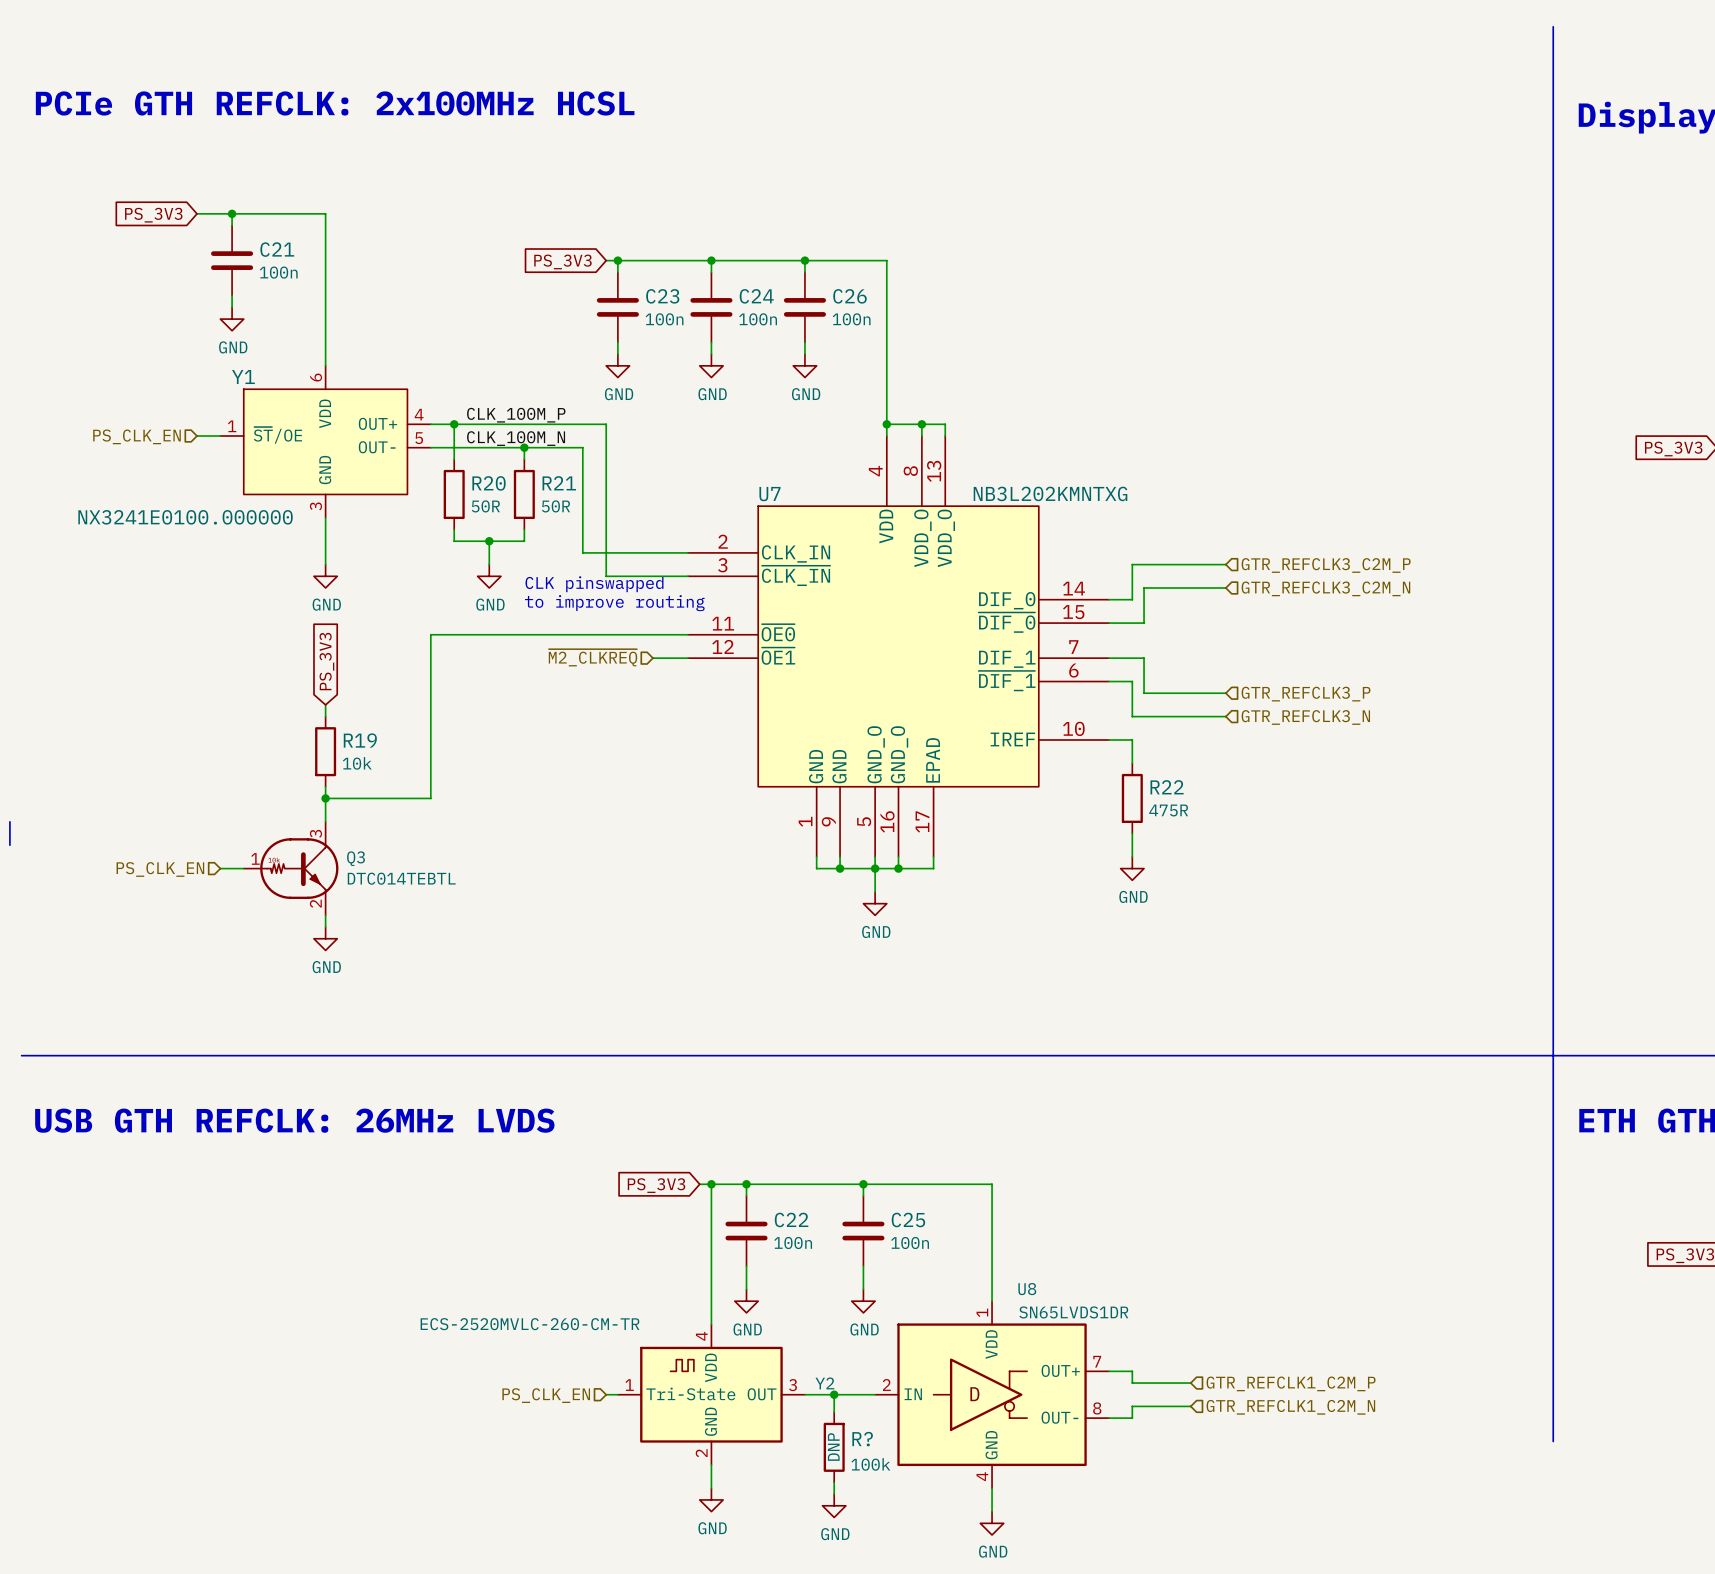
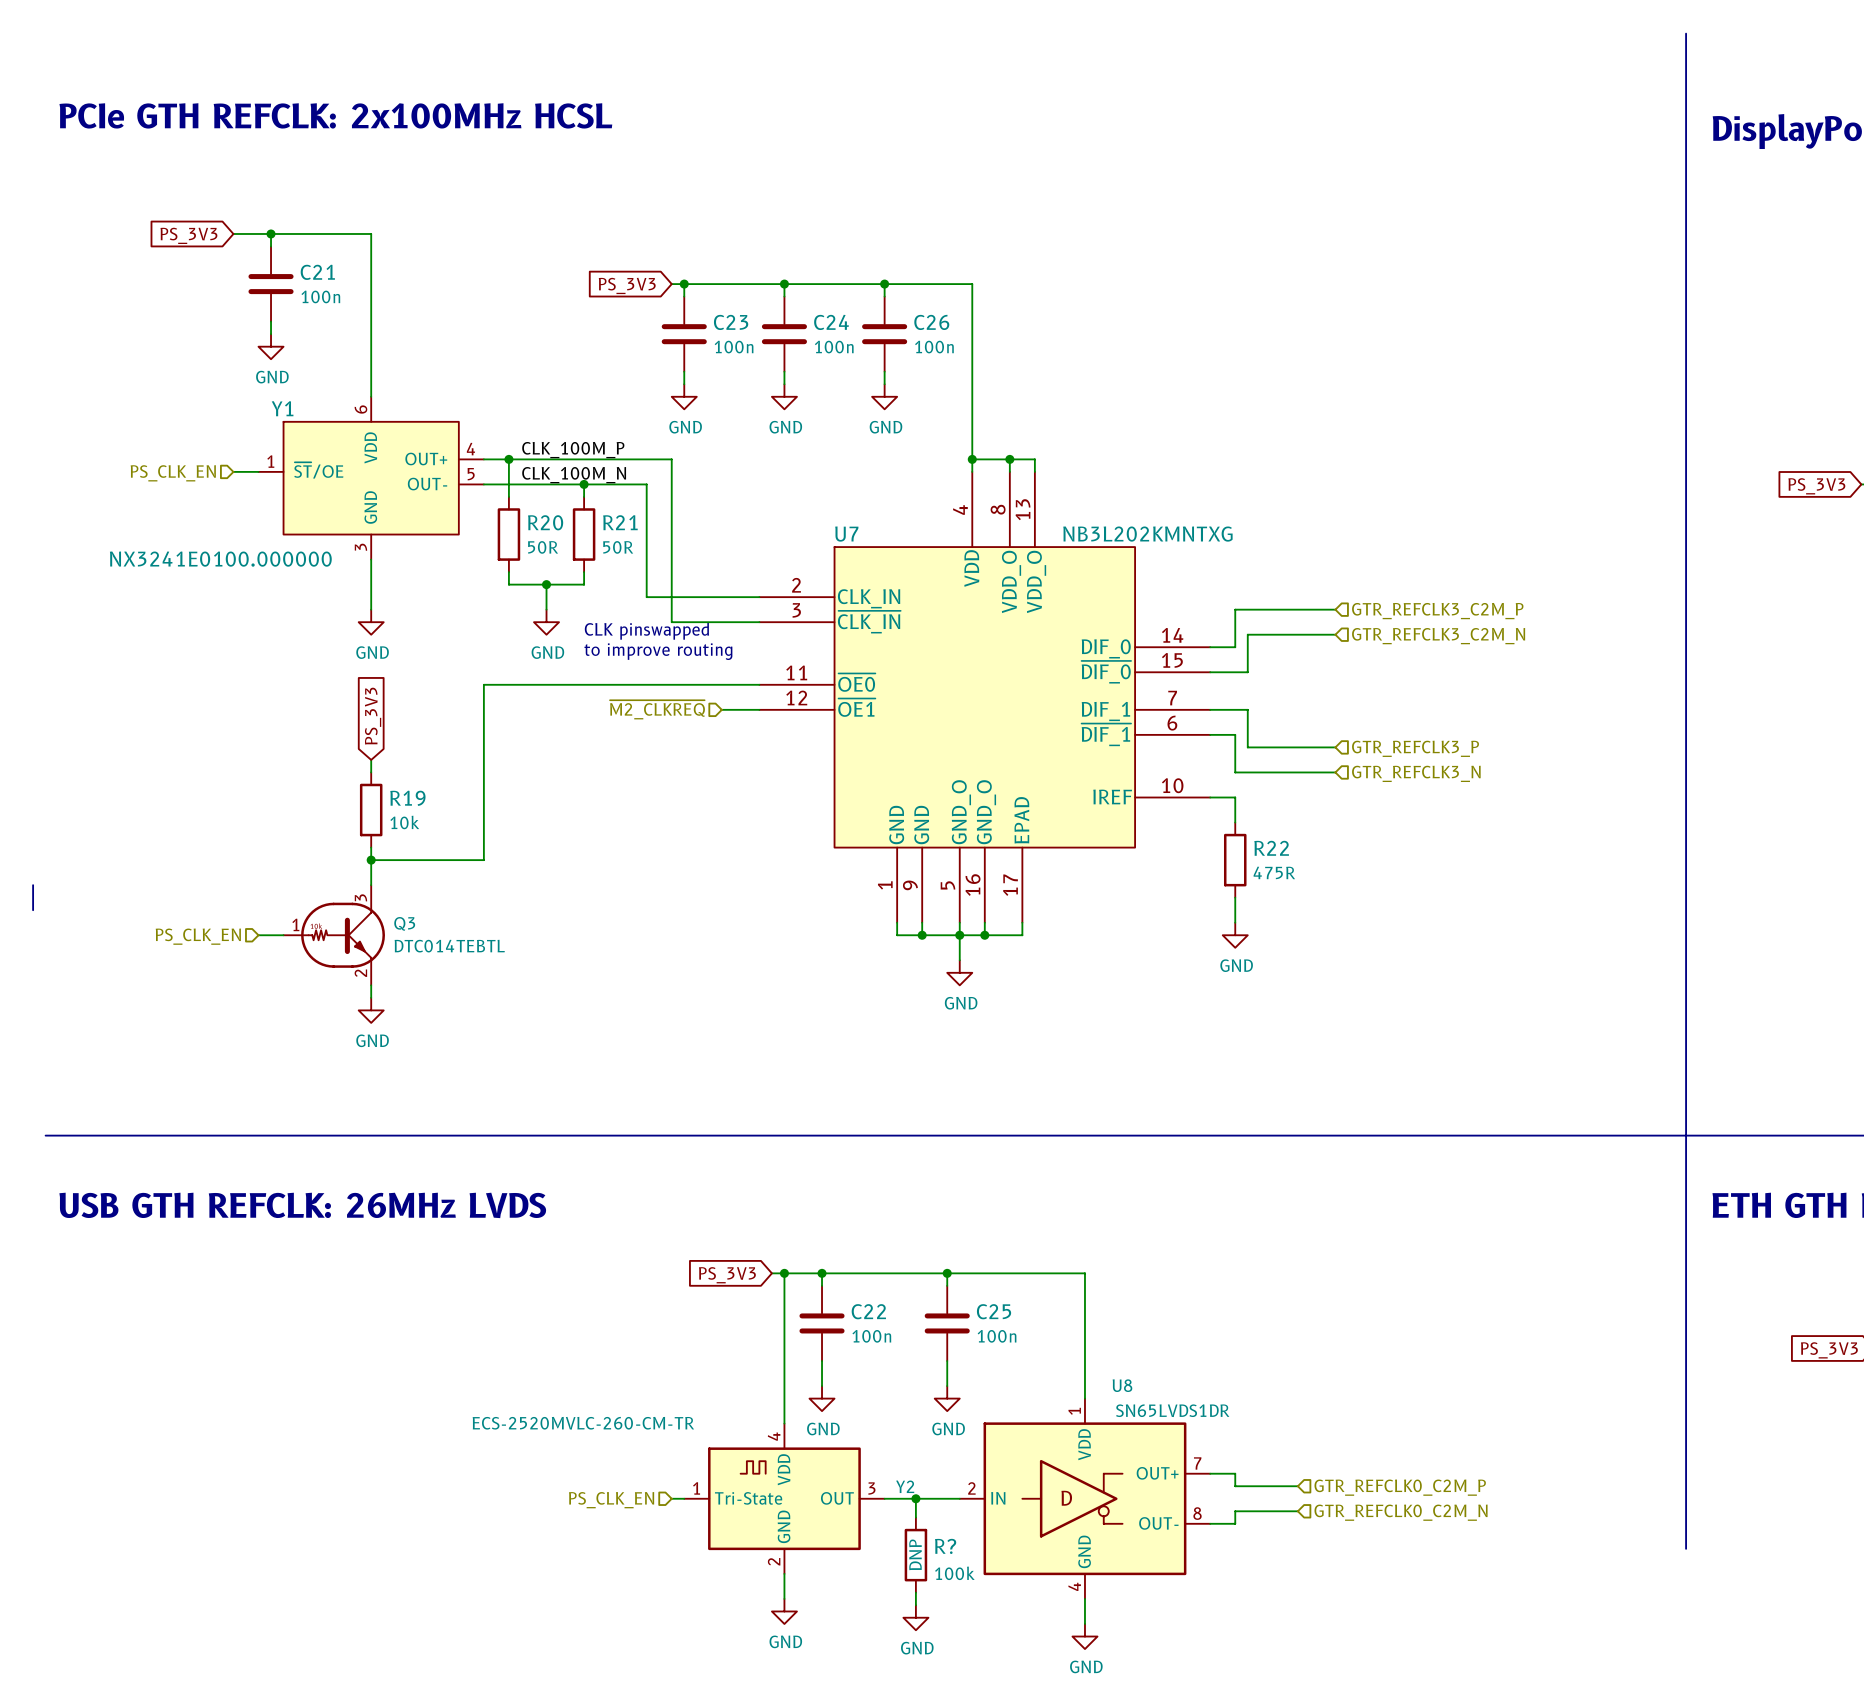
hierarchical label: GTR_REFCLK1_C2M_P (1291, 1383) -> GTR_REFCLK0_C2M_P (1400, 1487)
hierarchical label: GTR_REFCLK1_C2M_N (1290, 1407) -> GTR_REFCLK0_C2M_N (1401, 1512)

